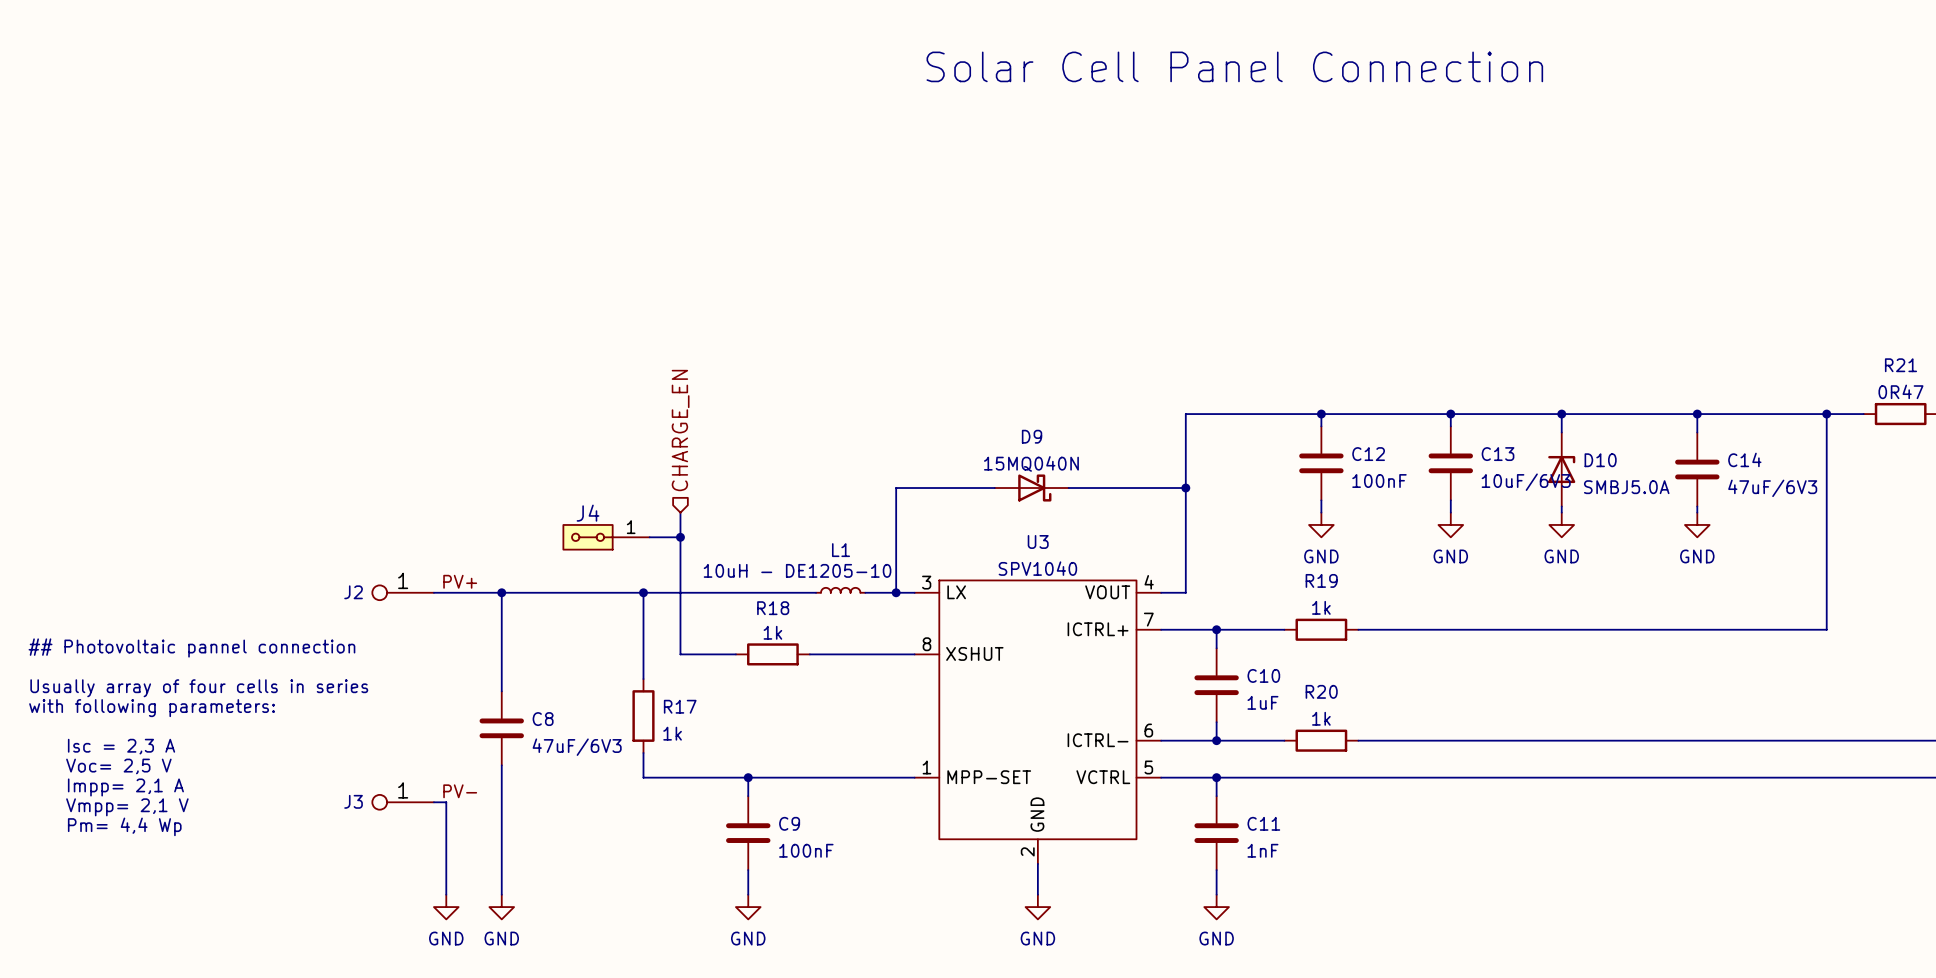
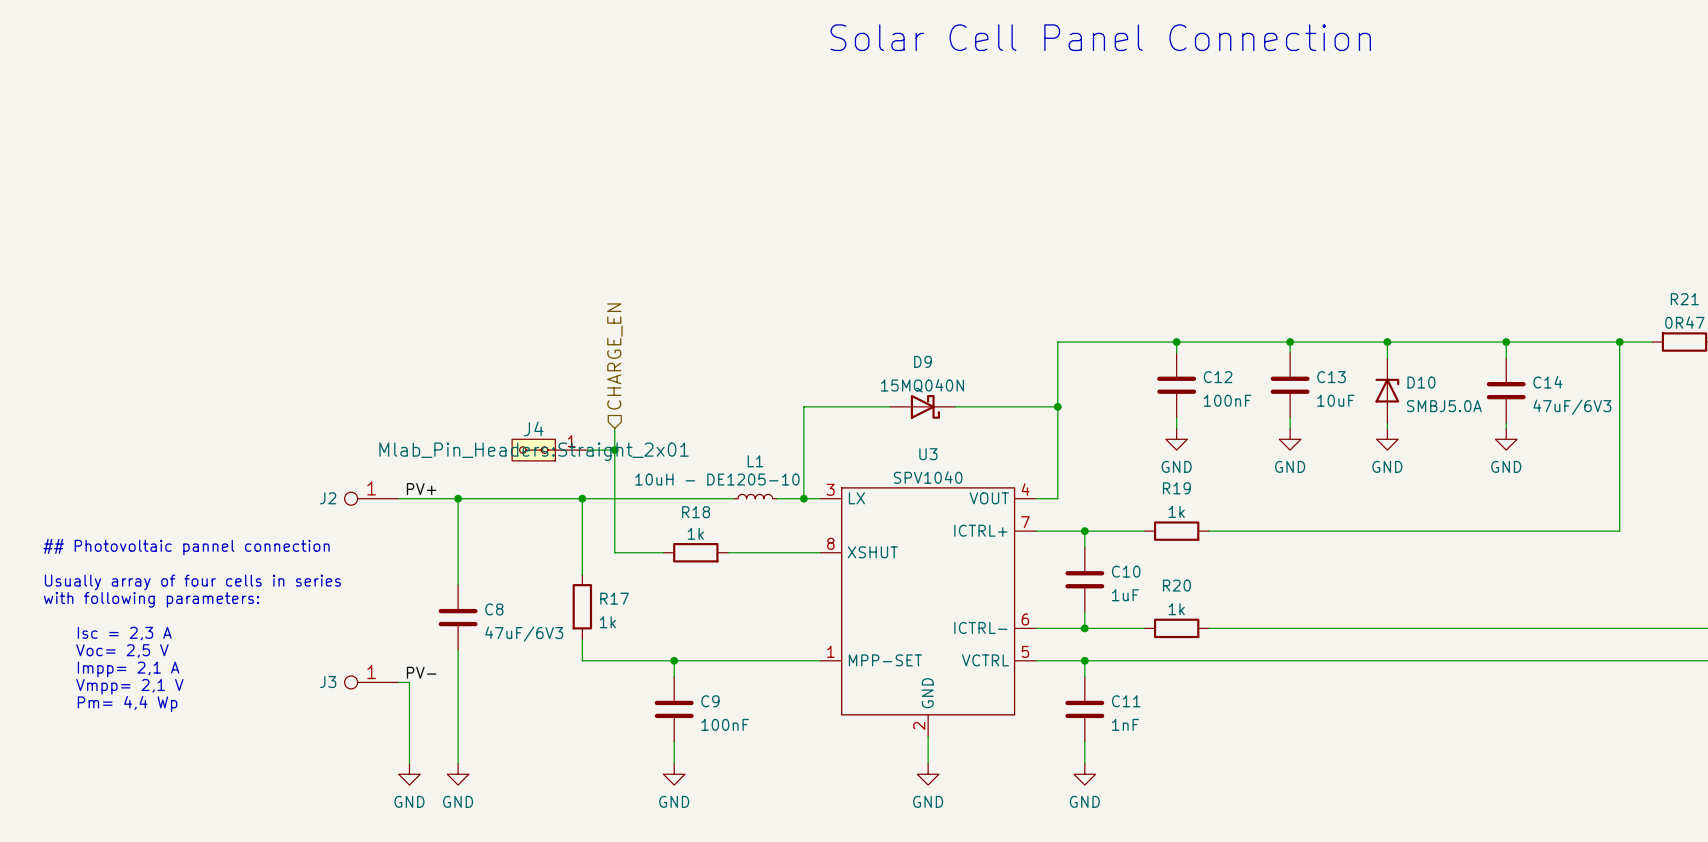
C13 value: 10uF/6V3 (1526, 482) -> 10uF (1335, 400)
J4 text: none -> Mlab_Pin_Headers:Straight_2x01 (534, 451)

